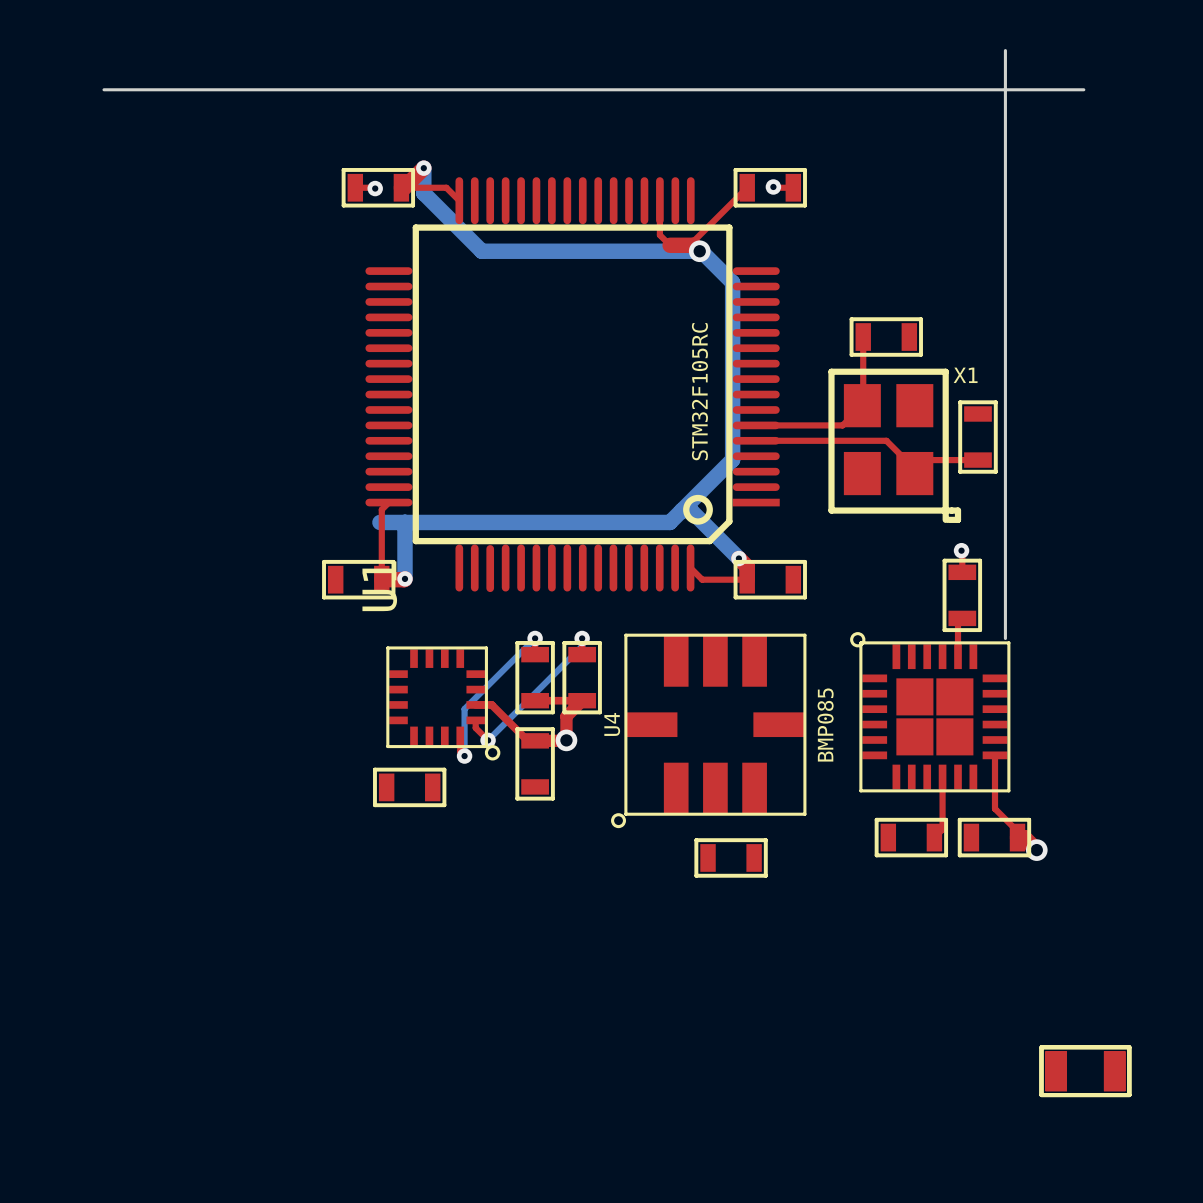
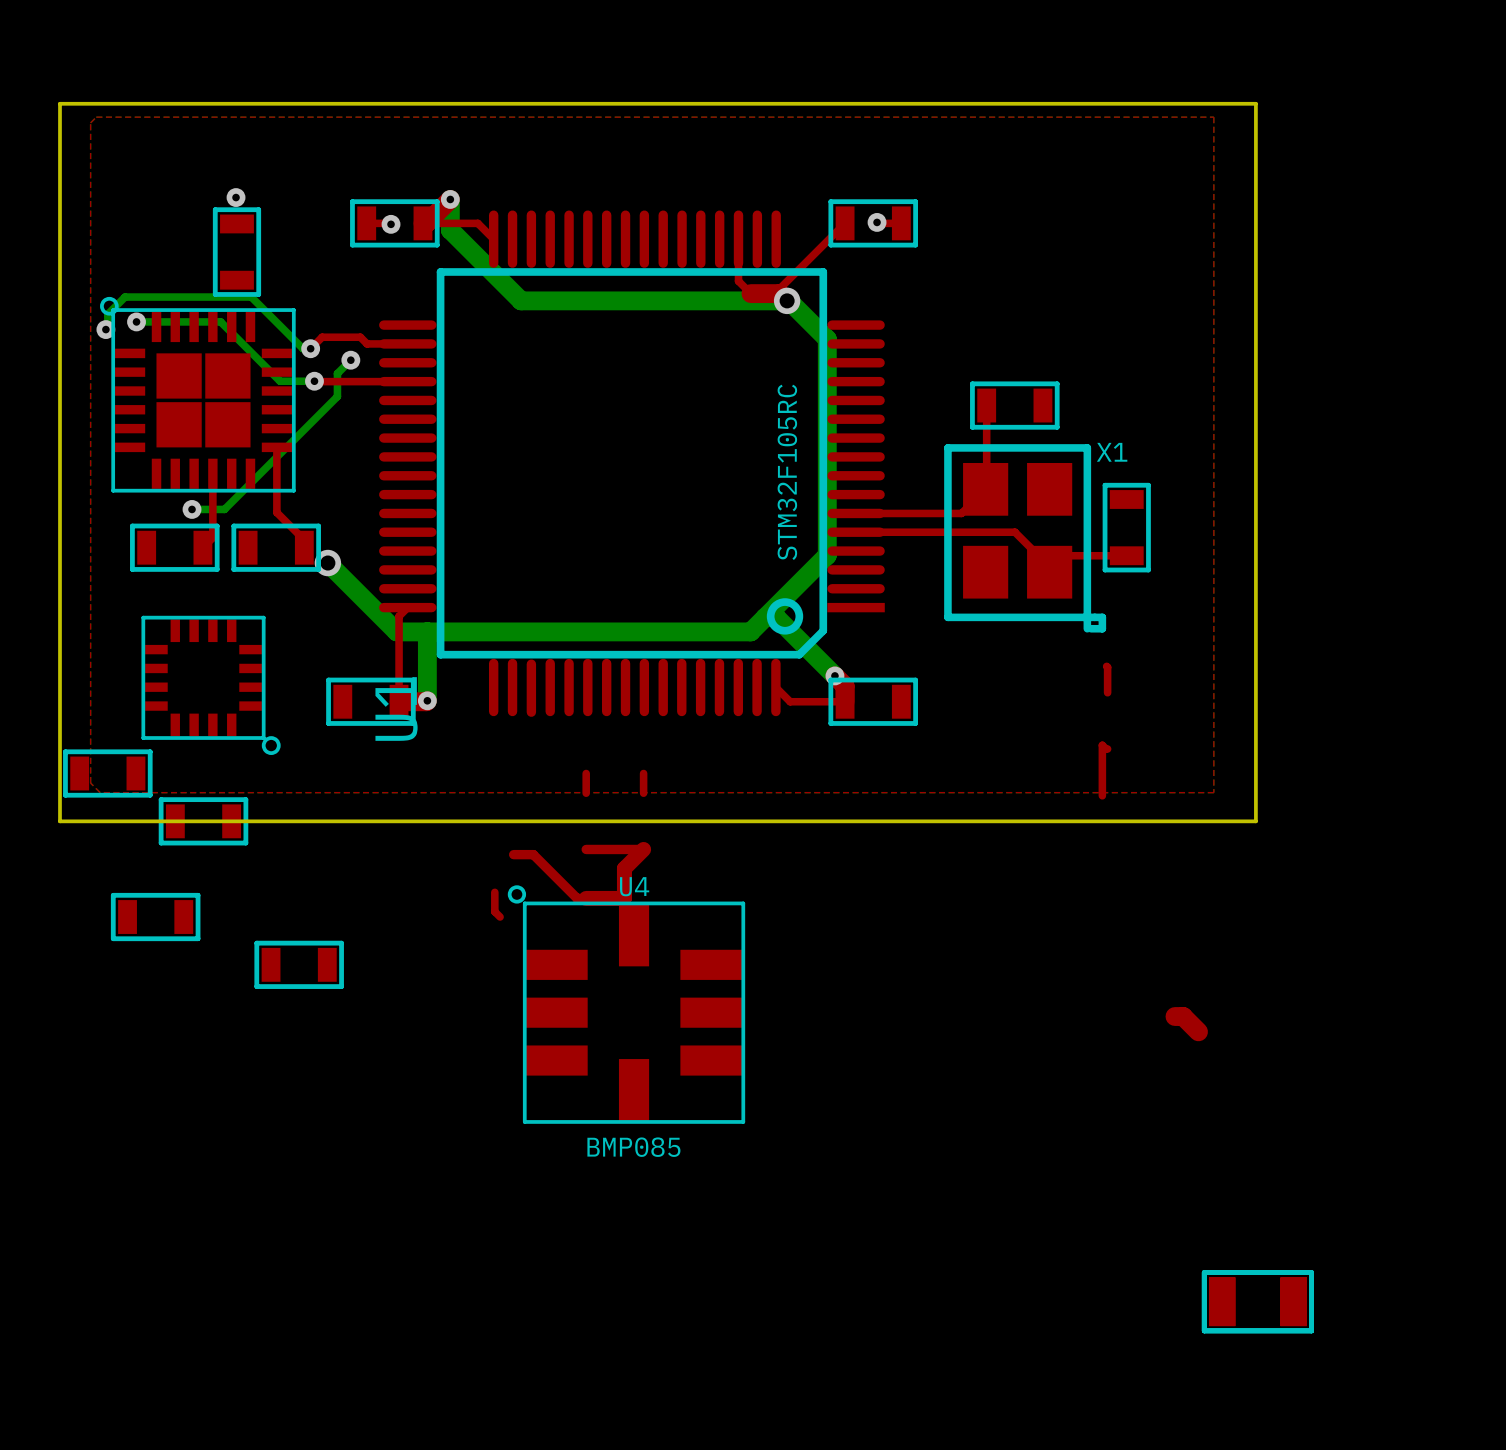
board edge: (1005, 50) (1005, 638) -> none
board edge: none -> (59, 103) (59, 821) (1255, 821) (1255, 103)
top zone outline: none -> (96, 117) (1213, 117) (1213, 792) (100, 792) (90, 783) (90, 122) (96, 117)
via: none -> (236, 197)
part: none -> (236, 252)
bottom track: none -> (136, 321) (220, 321) (280, 381) (314, 381)
via: none -> (136, 321)
bottom track: none -> (105, 329) (107, 327) (107, 314) (125, 297) (251, 297) (303, 348) (310, 348)
via: none -> (105, 329)
top track: none -> (407, 343) (367, 343) (360, 337) (322, 337) (310, 348)
via: none -> (310, 348)
bottom track: none -> (350, 360) (337, 373) (337, 396) (224, 509) (192, 509)
via: none -> (350, 360)
top track: none -> (314, 381) (407, 381)
via: none -> (314, 381)
part: none -> (197, 394)
top track: none -> (276, 447) (276, 512) (303, 539)
top track: none -> (212, 473) (212, 537) (202, 547)
via: none -> (192, 509)
part: none -> (174, 547)
part: none -> (276, 547)
bottom track: none -> (327, 563) (396, 631)
via: none -> (327, 563)
via: (961, 550) -> none
part: (962, 595) -> none
part: none -> (107, 773)
bottom track: (535, 638) (464, 709) (464, 756) -> none
via: (535, 638) -> none
bottom track: (582, 638) (582, 646) (488, 740) -> none
via: (582, 638) -> none
part: none -> (203, 821)
part: (535, 677) -> none
part: (582, 677) -> none
part position: (443, 703) -> (211, 685)
part: (930, 712) -> none
top track: (475, 720) (475, 727) (488, 740) -> none
U4 rotation: 0° (708, 730) -> 90° clockwise (626, 1004)
U4 position: (708, 730) -> (626, 1004)
via: (488, 740) -> none
via: (566, 740) -> none
top track: (995, 755) (995, 808) (1016, 830) -> none
part: none -> (155, 917)
via: (464, 756) -> none
part: (535, 763) -> none
top track: (942, 776) (942, 829) (934, 837) -> none
part: (409, 787) -> none
part: none -> (299, 964)
part: (911, 837) -> none
part: (994, 837) -> none
via: (1036, 850) -> none
part: (731, 857) -> none

